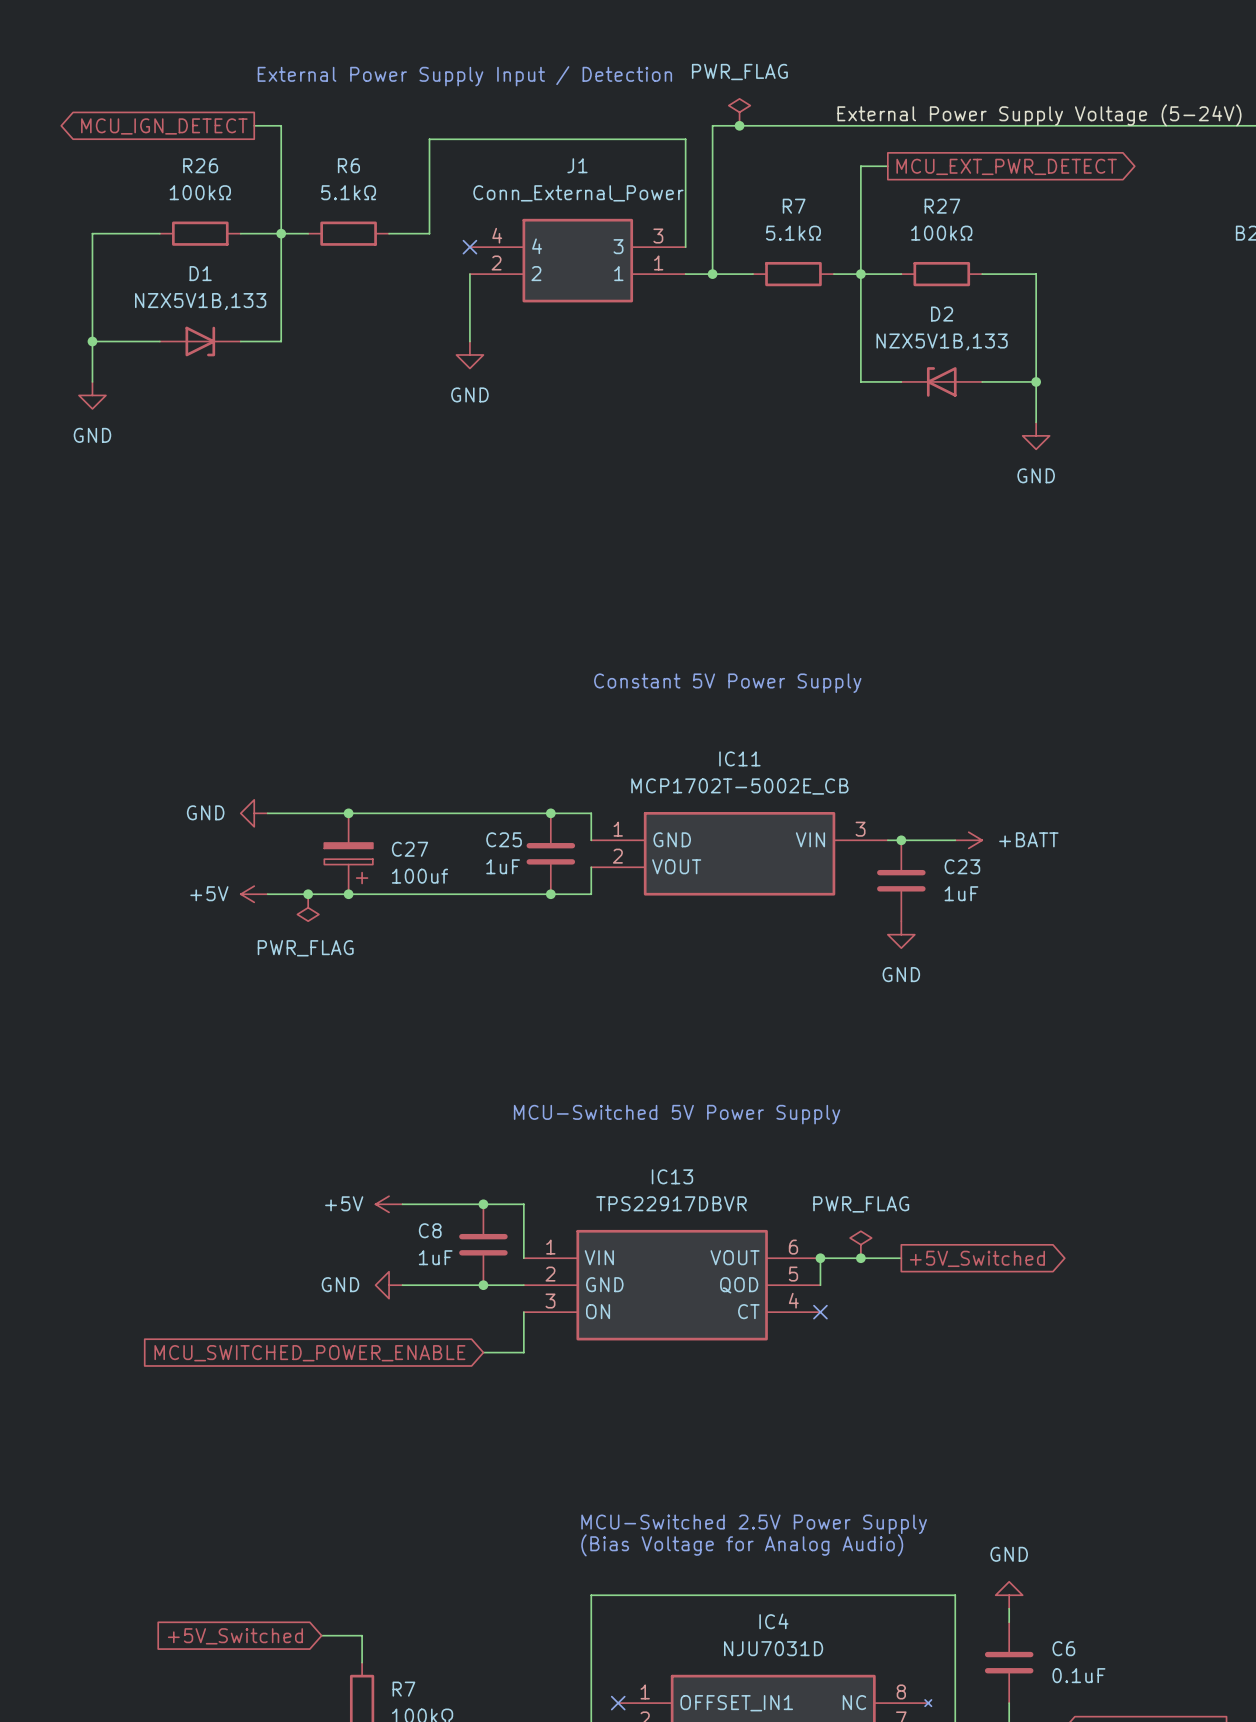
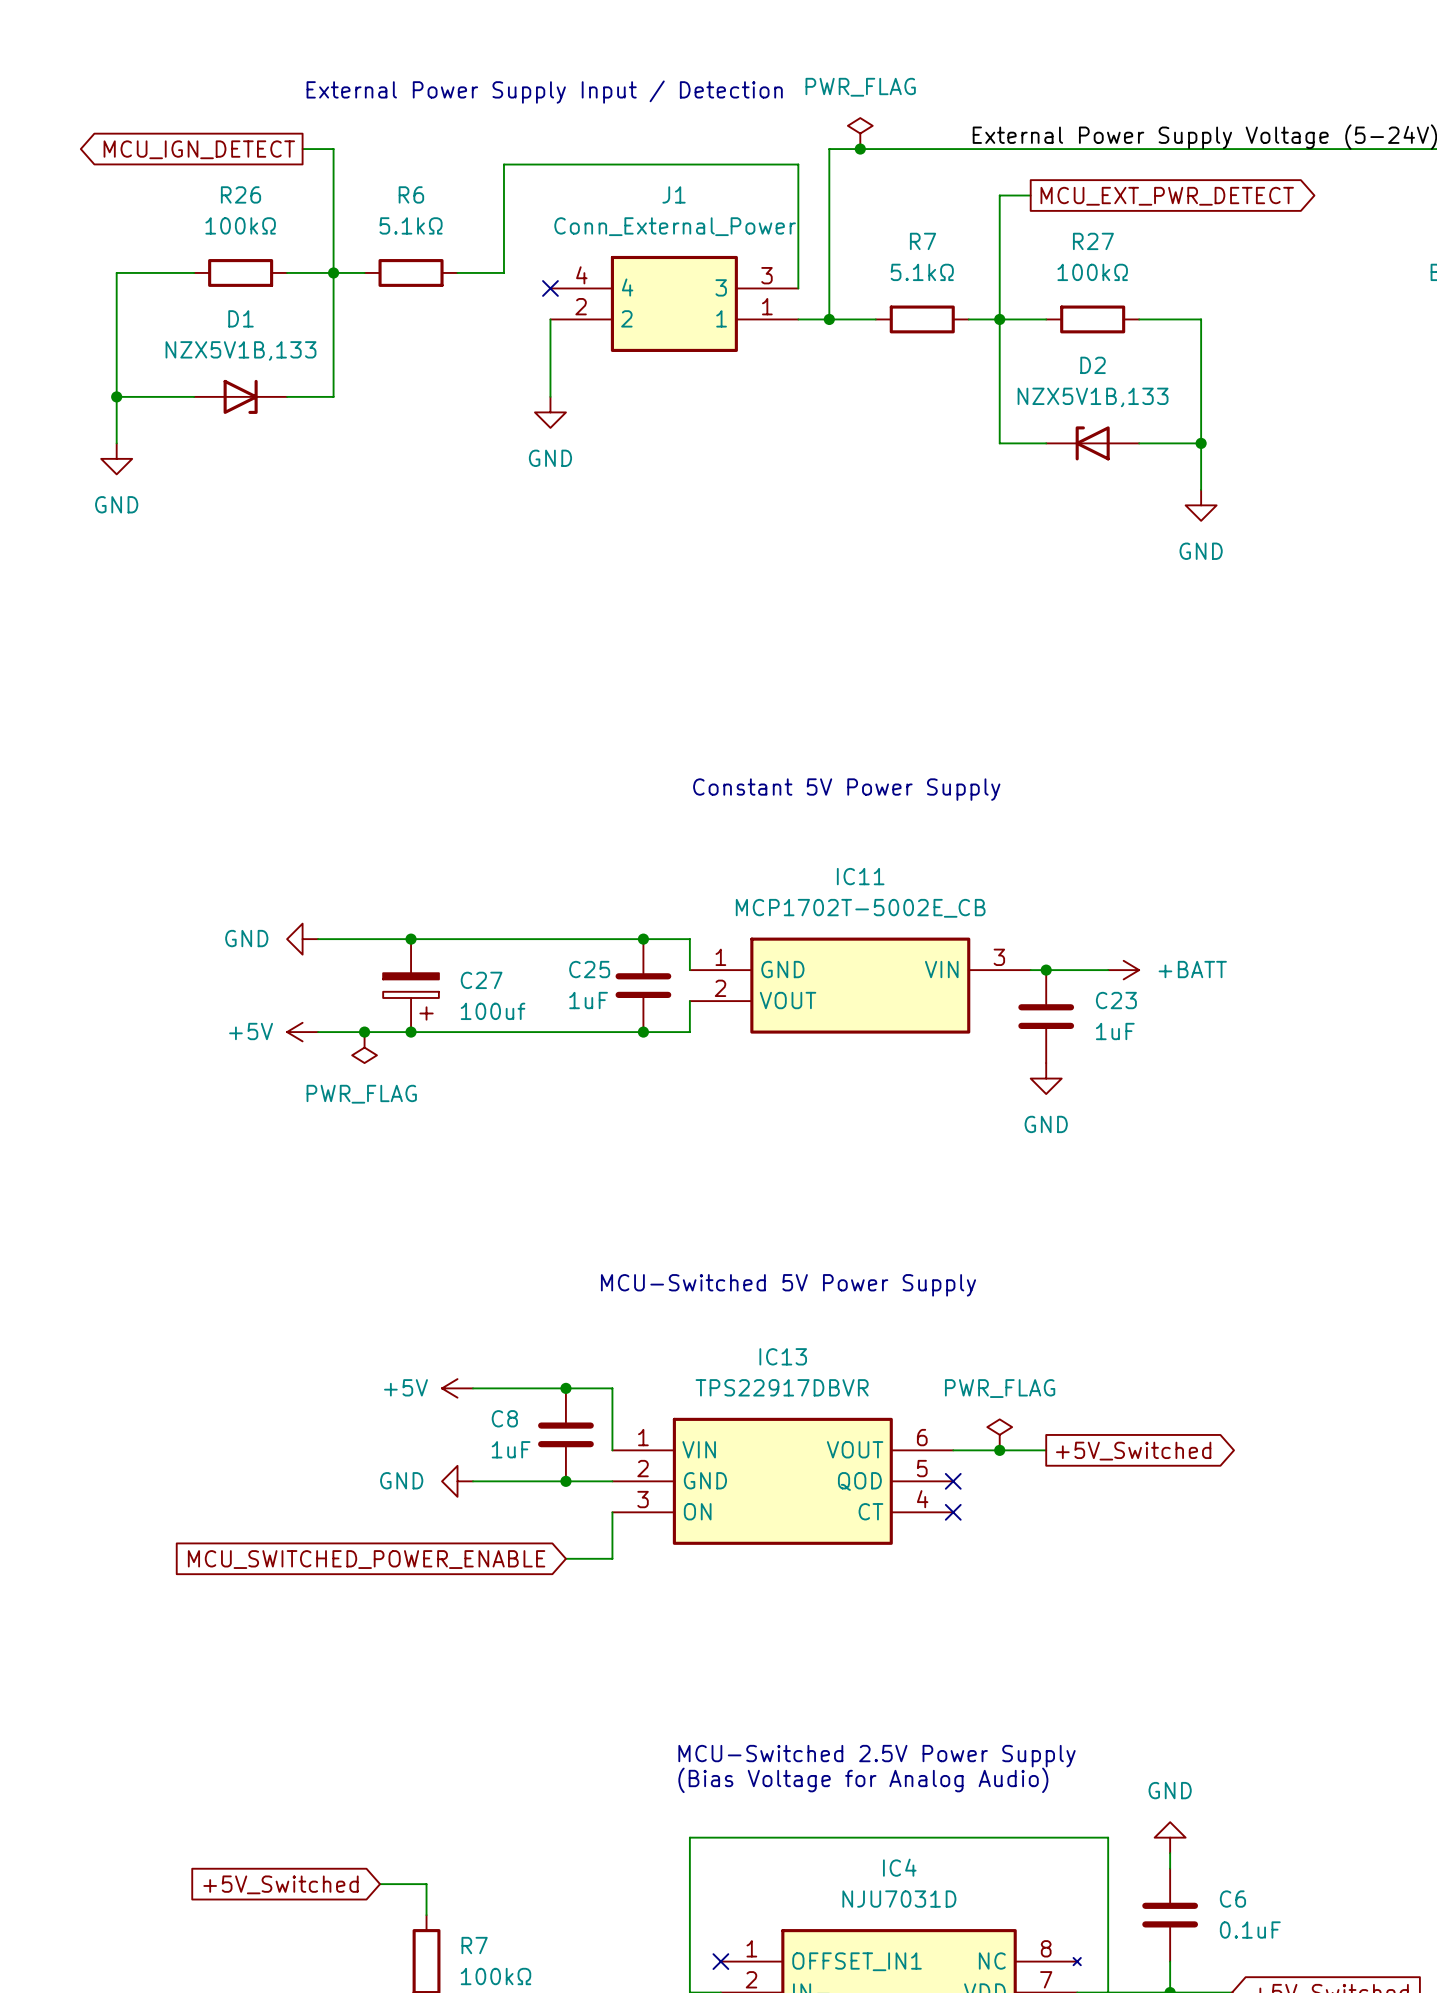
wire: (820, 1258) (820, 1285) -> none
junction: (820, 1258) -> none
no-connect mark: none -> (953, 1481)

